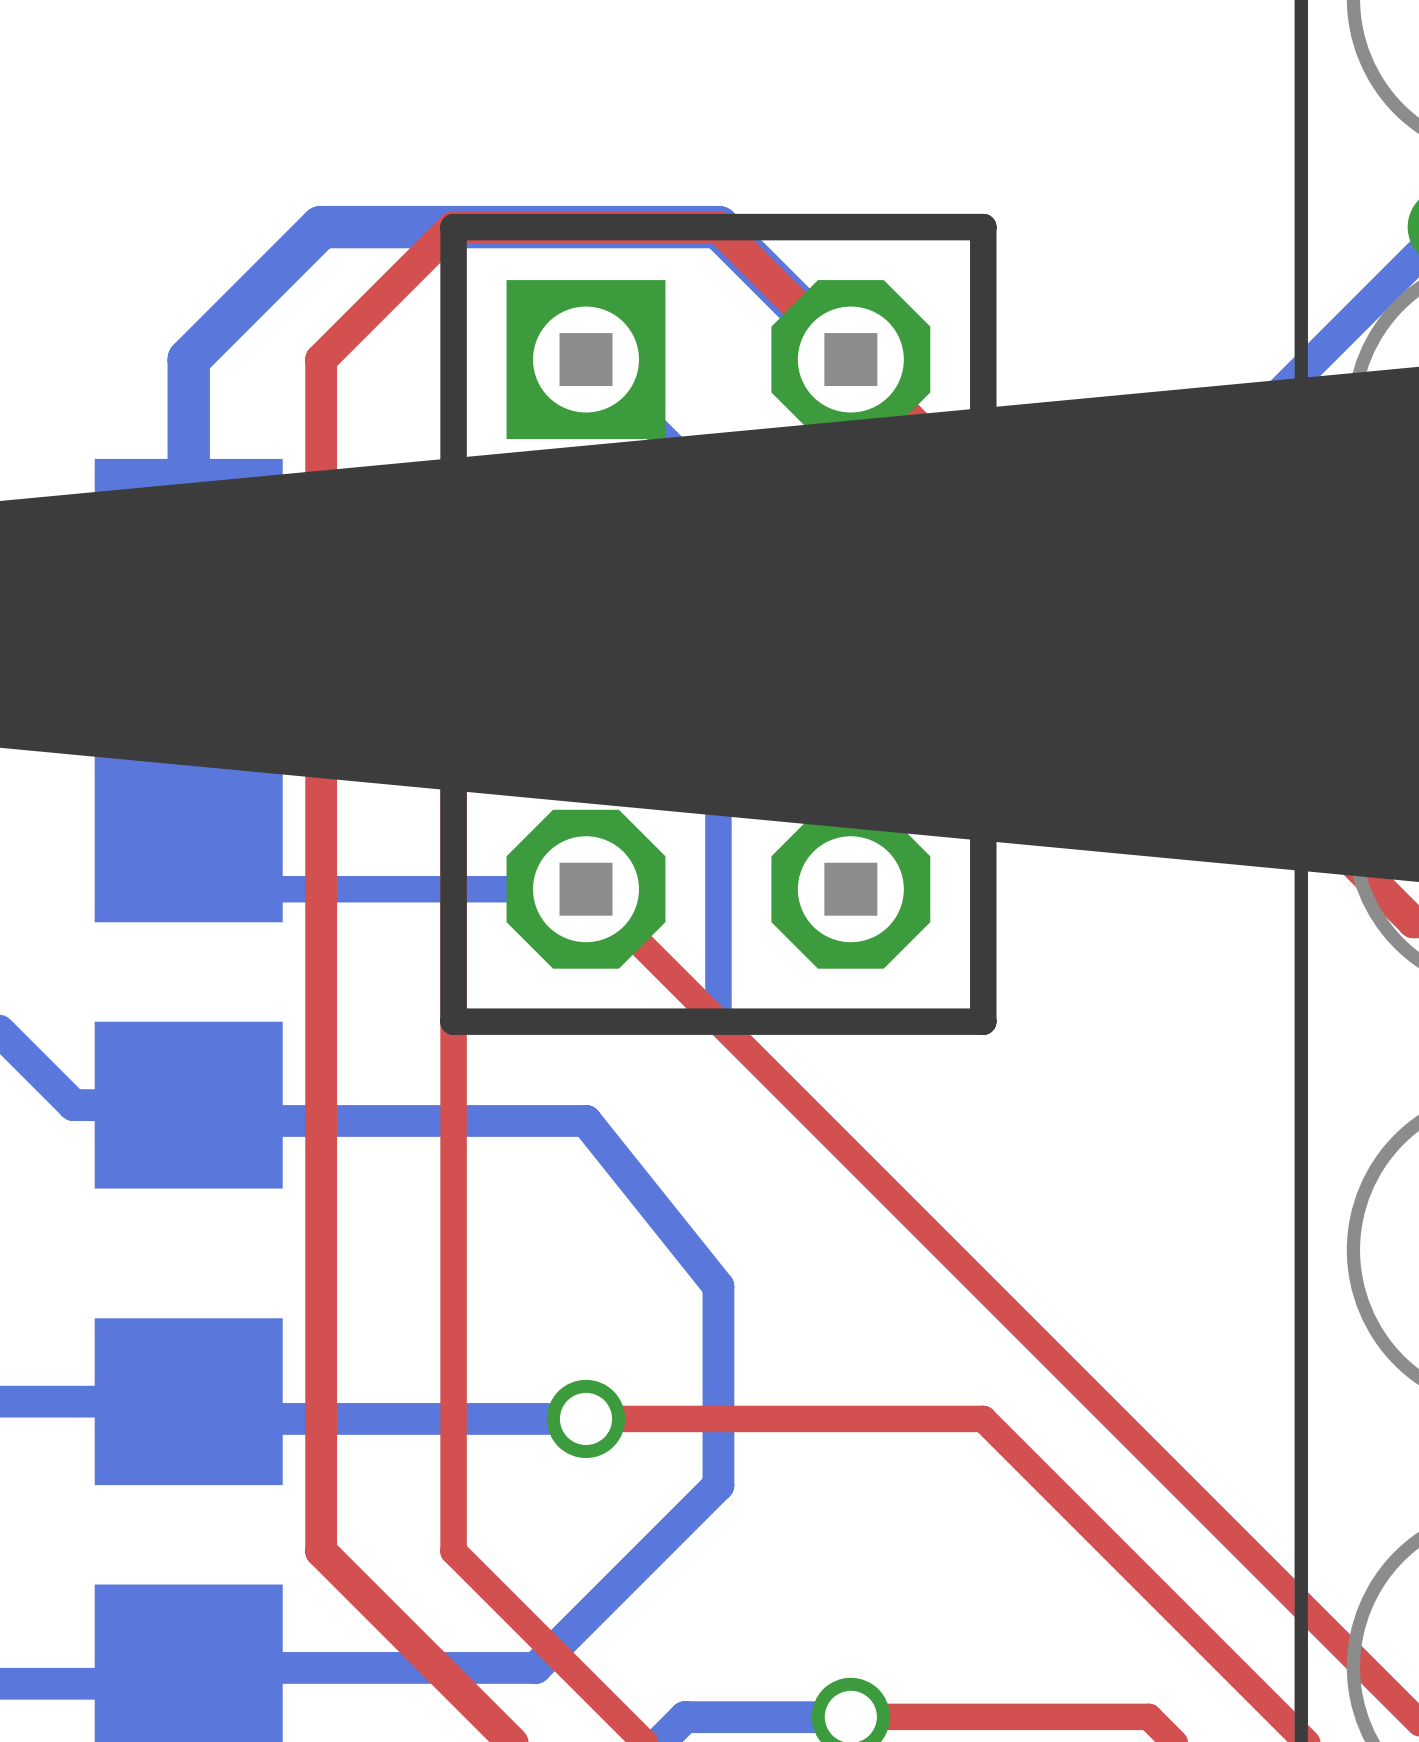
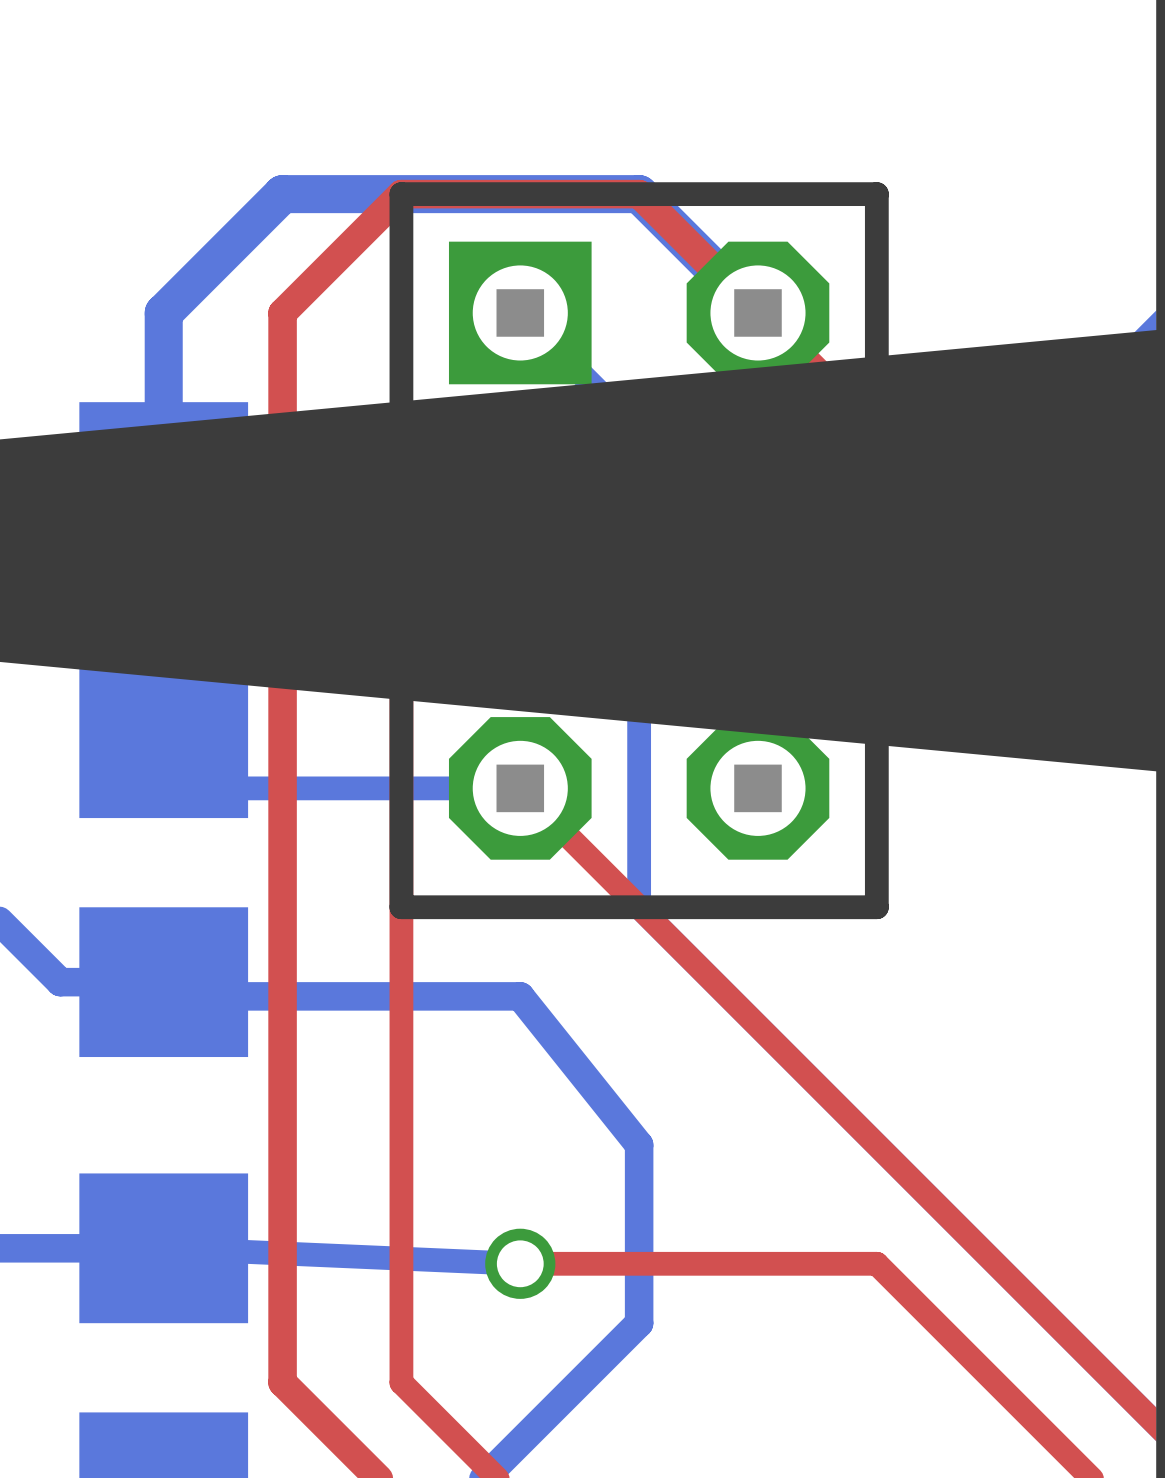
bottom track: (188, 1401) (188, 1418) (586, 1418) -> (163, 1248) (520, 1263)

